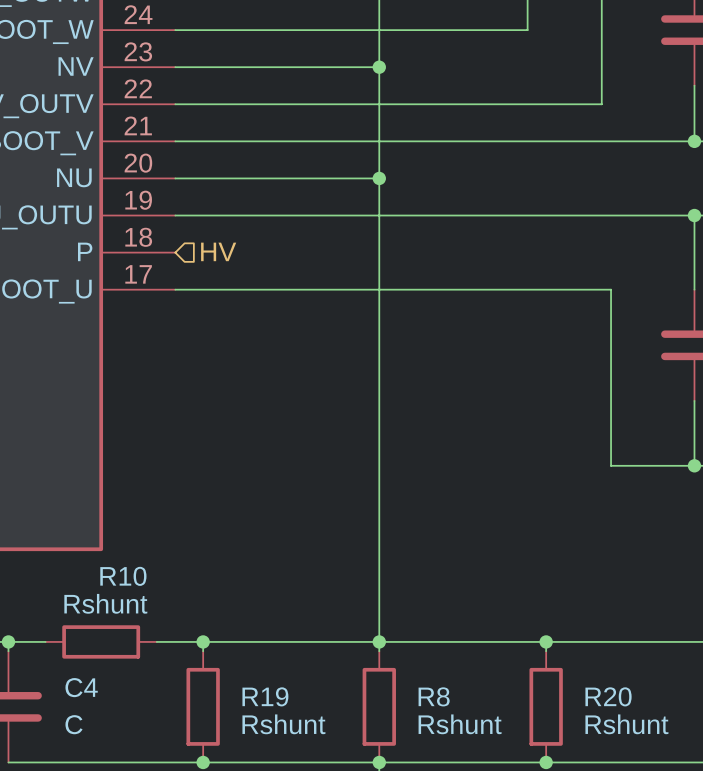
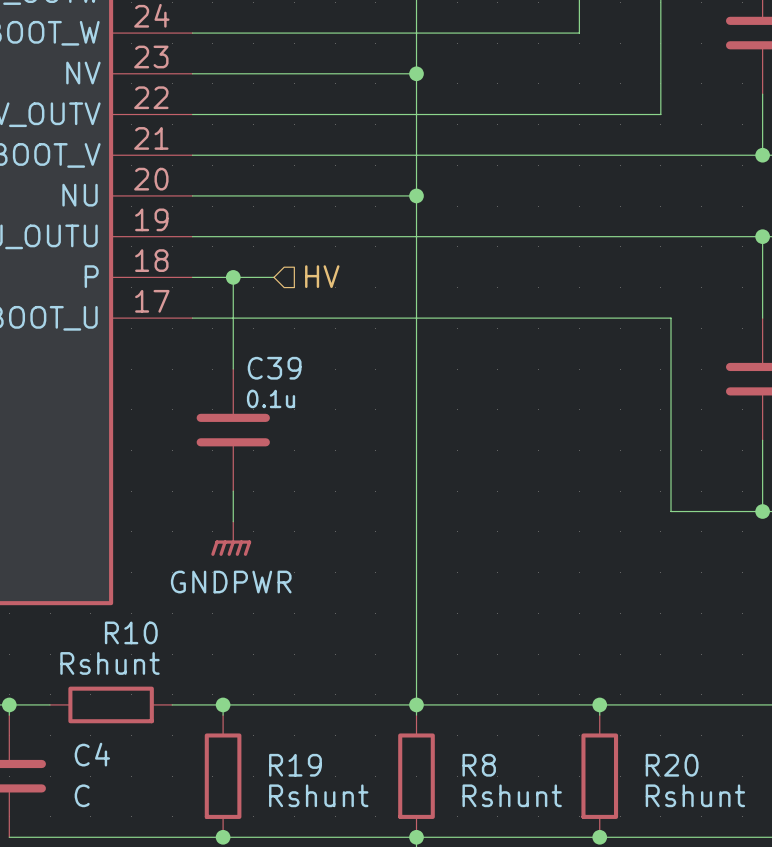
hierarchical label position: HV (218, 251) -> HV (322, 276)
wire: none -> (192, 277) (273, 277)
wire: none -> (233, 277) (233, 369)
junction: none -> (233, 277)
C39: none -> 0.1u (233, 430)
wire: none -> (233, 491) (233, 521)
power symbol: none -> GNDPWR (231, 538)

